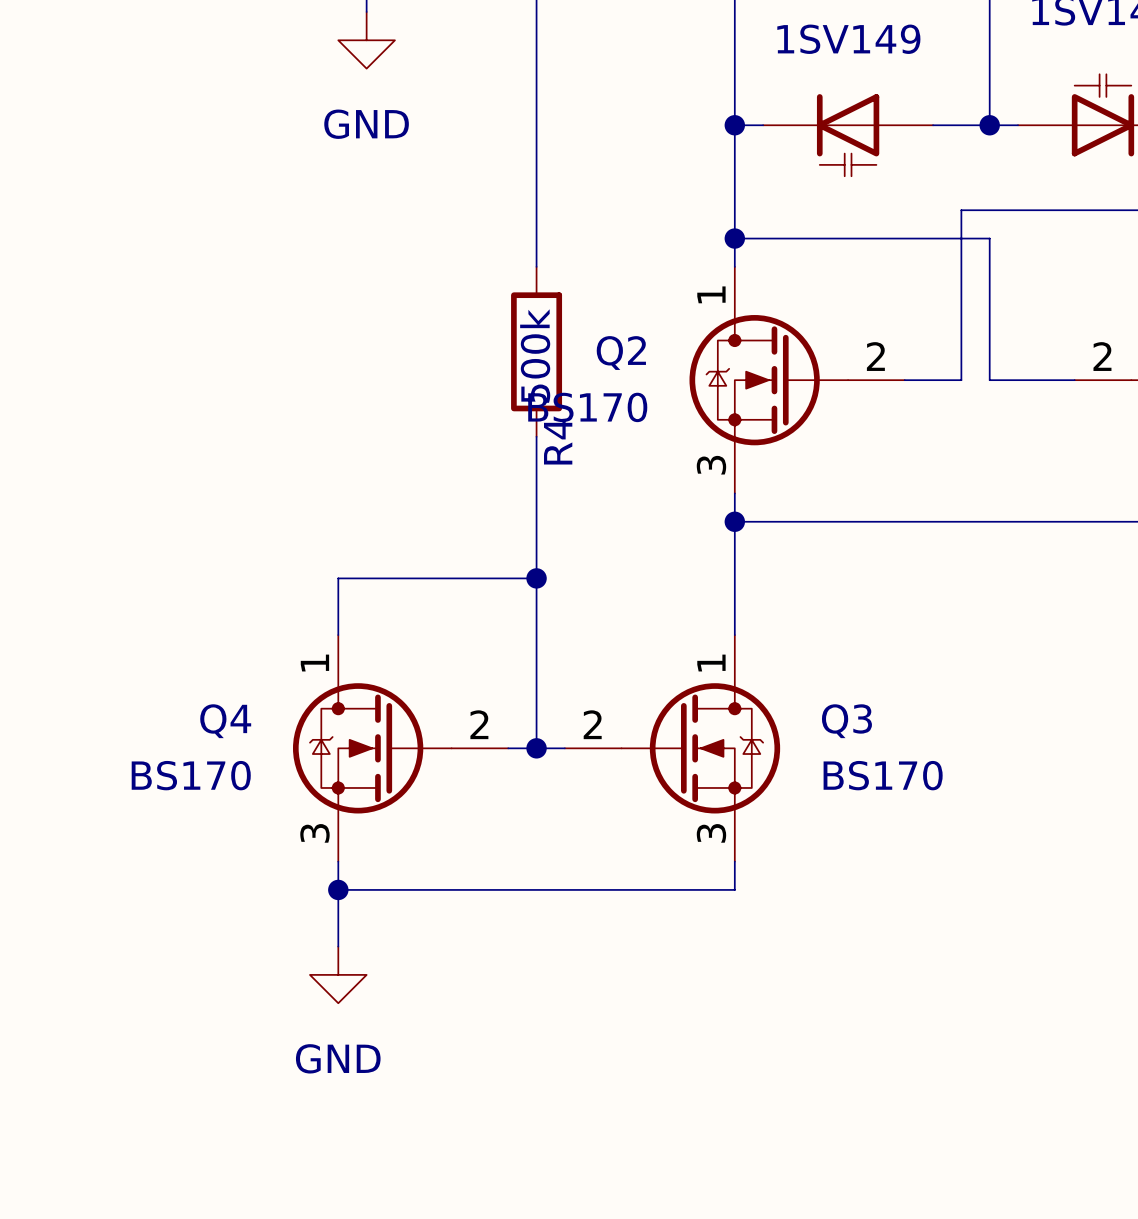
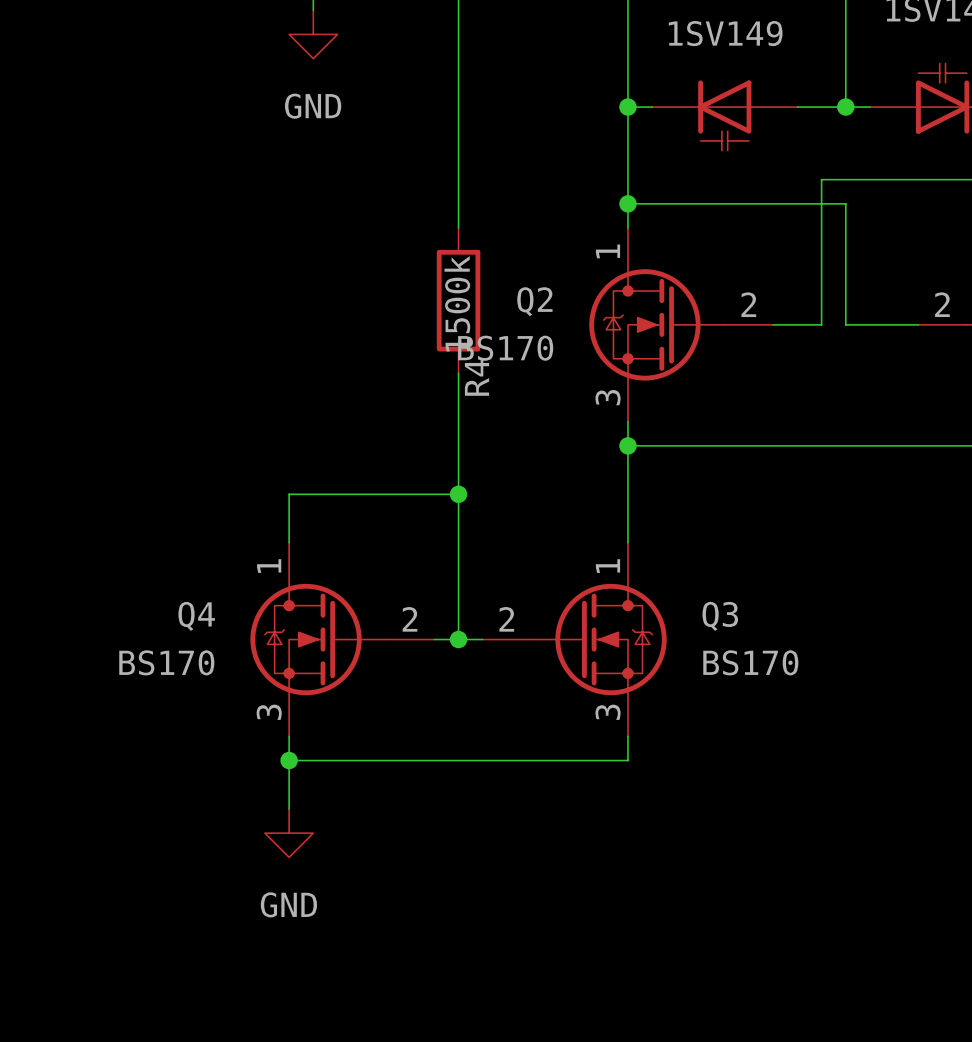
R4 value: 500k (535, 356) -> 1500k (457, 303)

